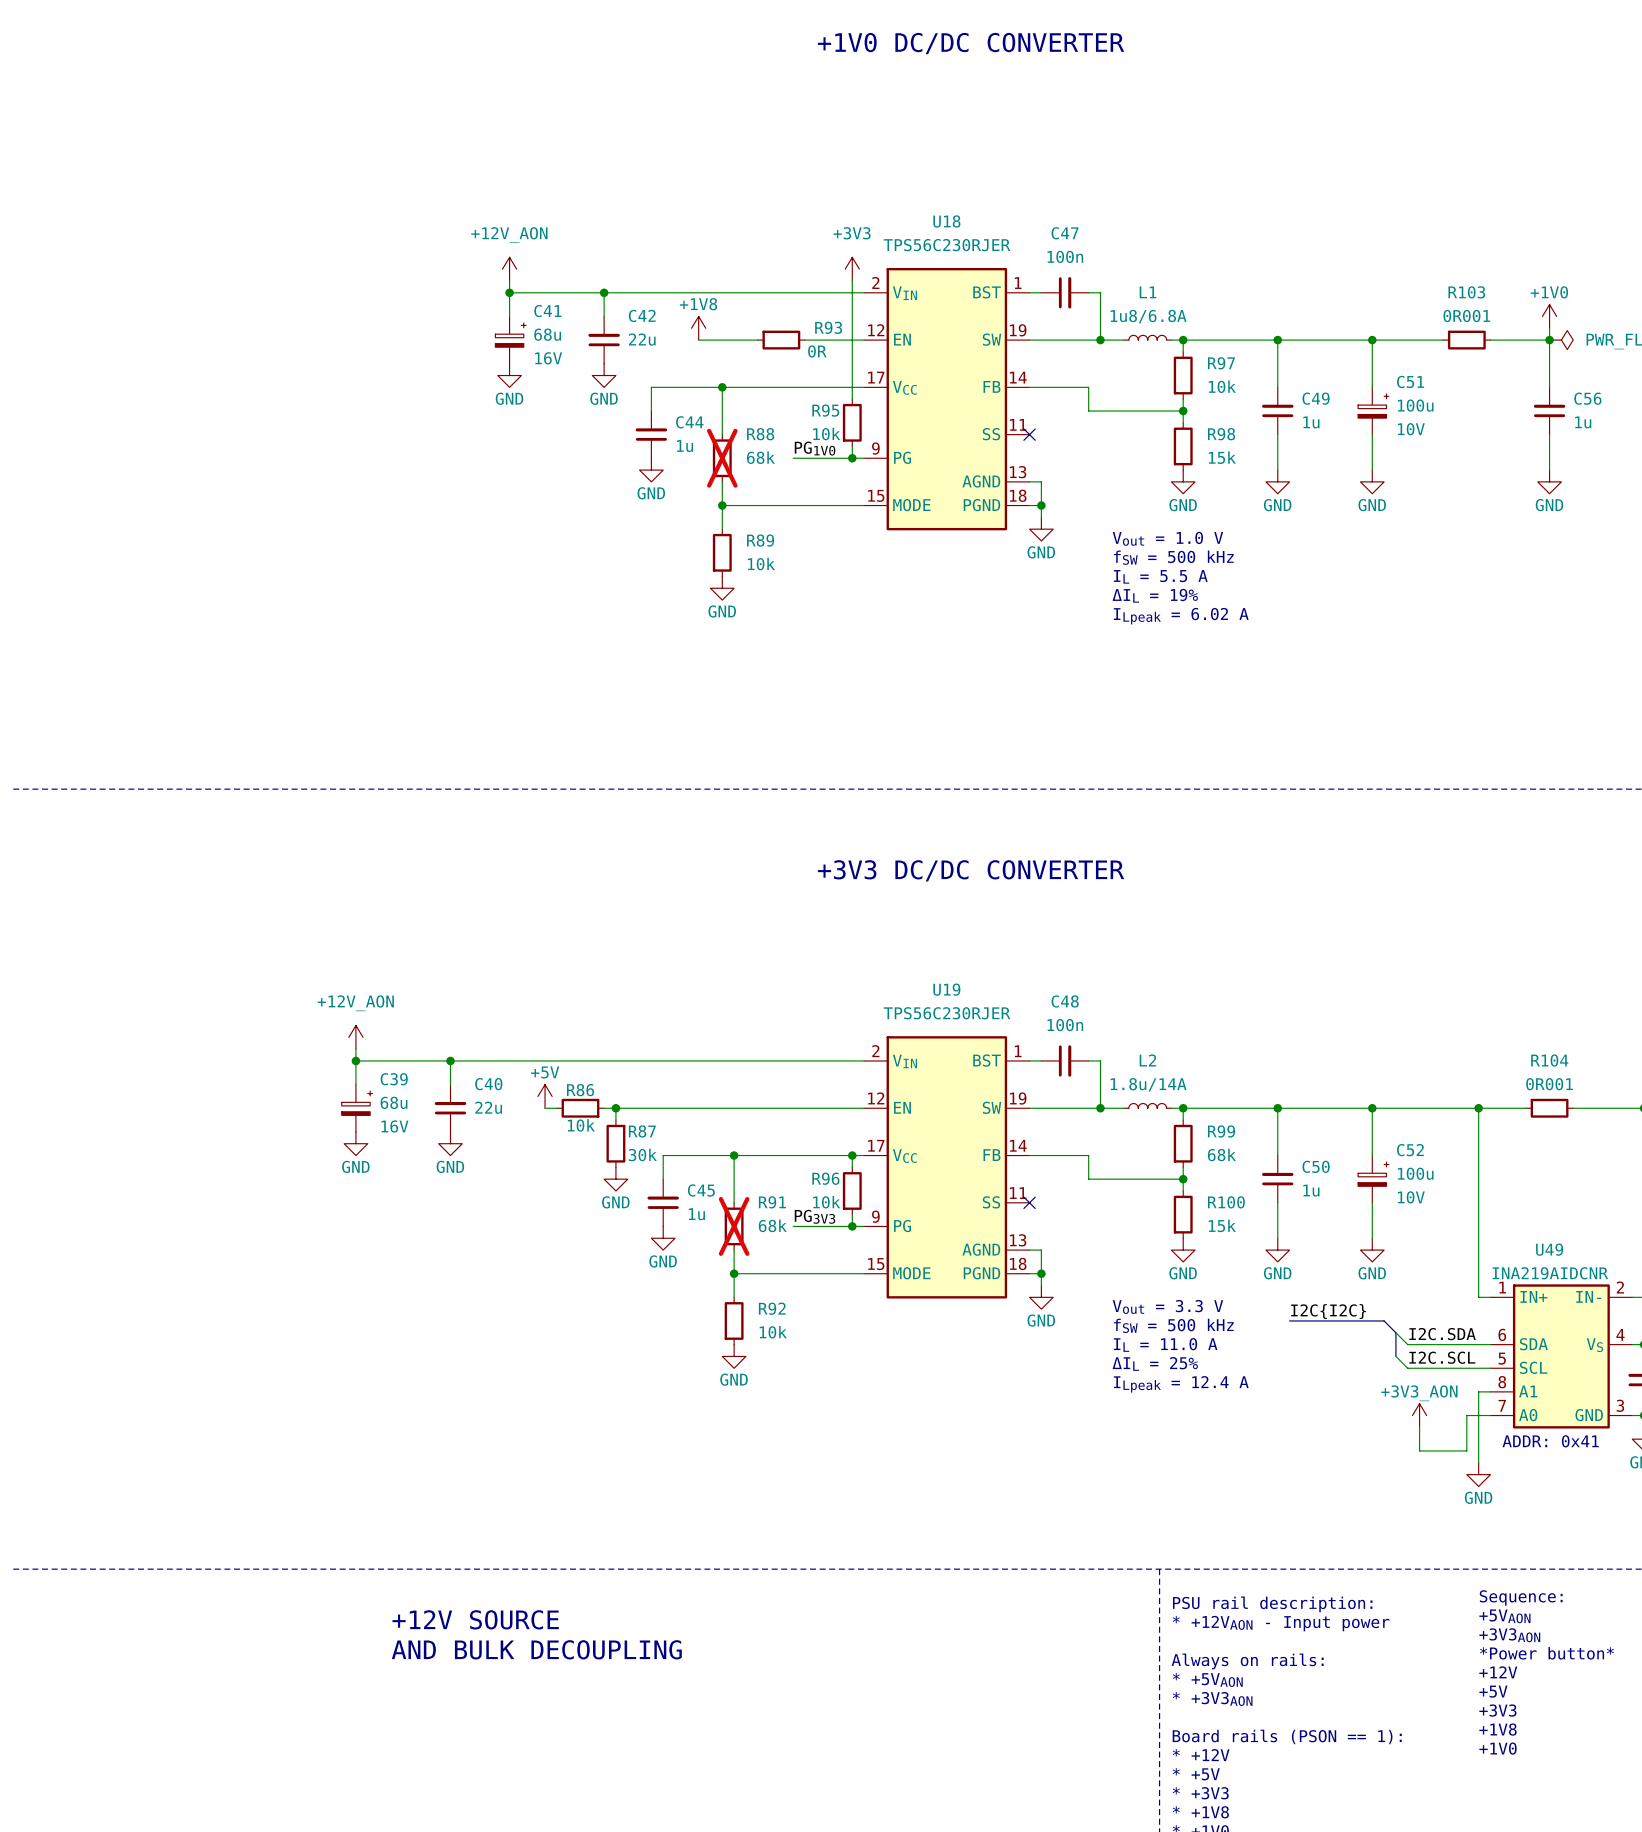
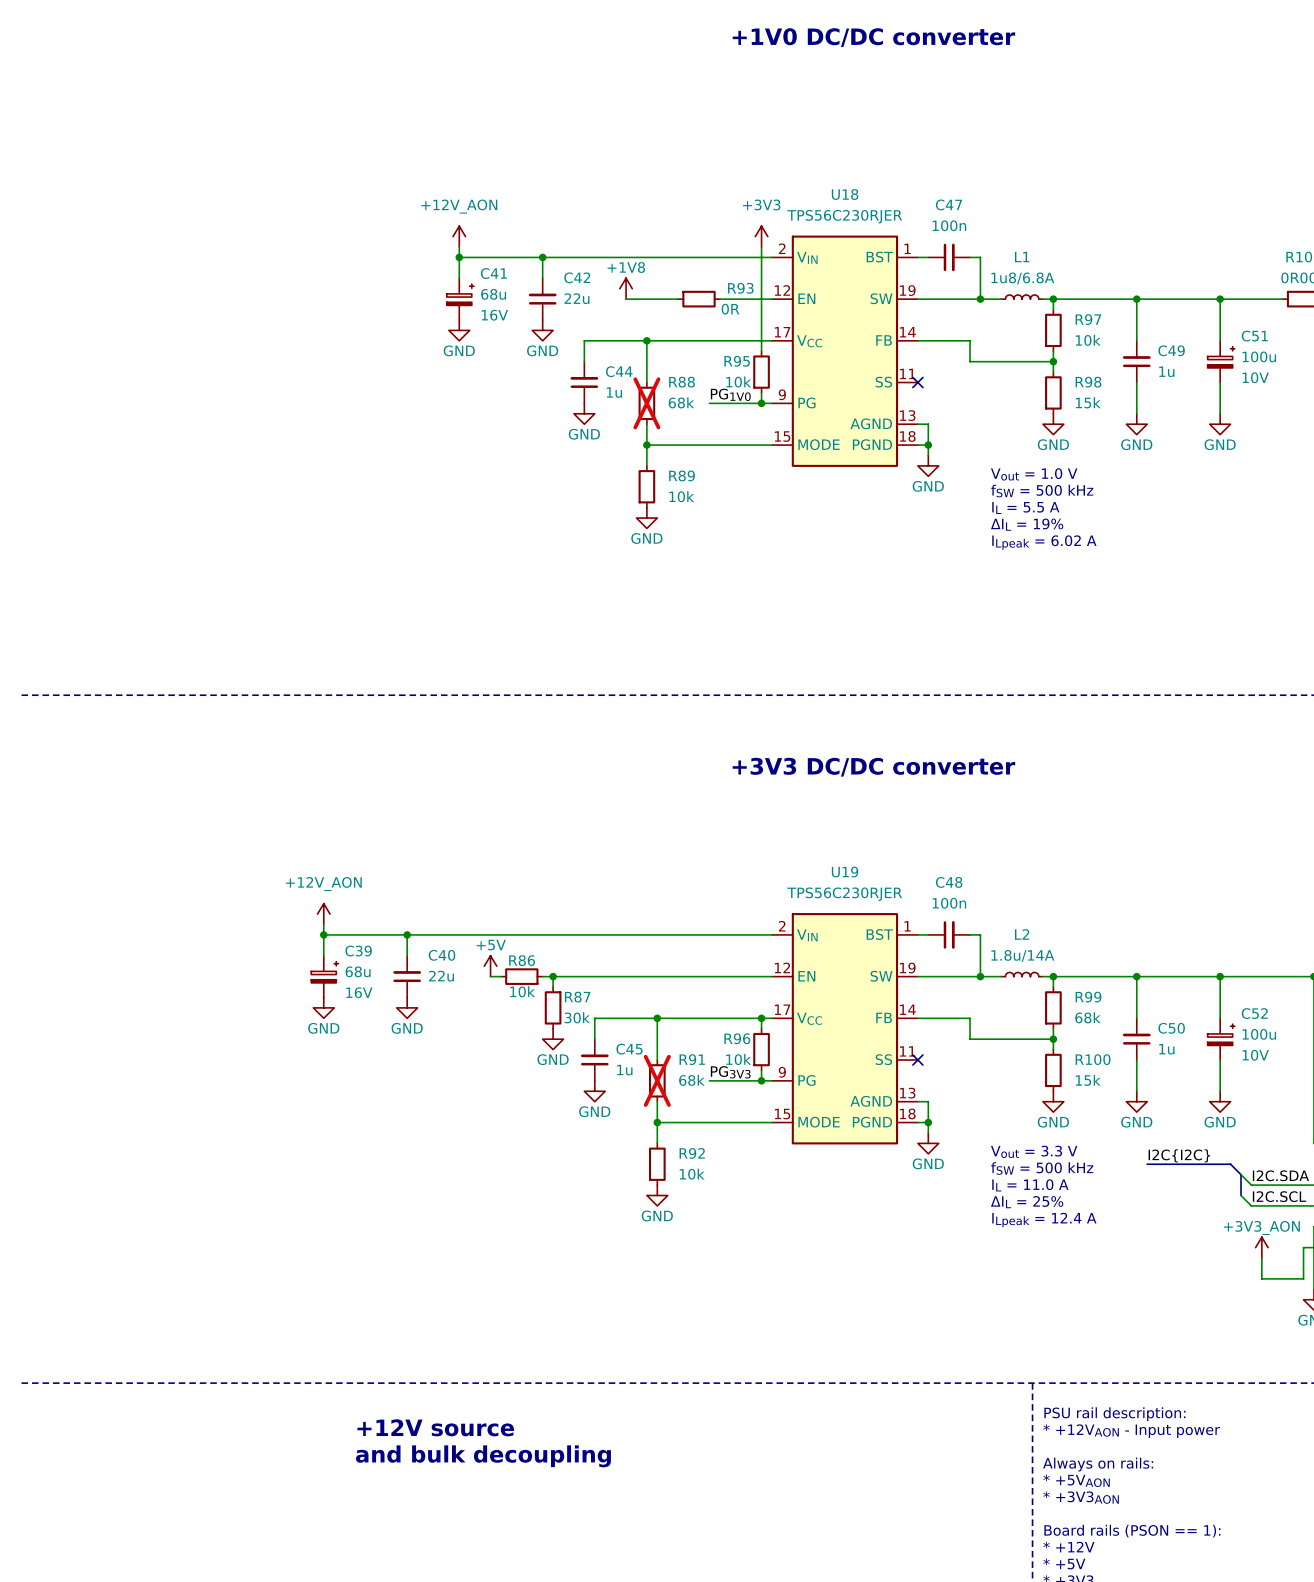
text: +1V0 DC/DC CONVERTER (971, 43) -> +1V0 DC/DC converter (873, 37)
text: +3V3 DC/DC CONVERTER (971, 870) -> +3V3 DC/DC converter (873, 767)
text: +12V SOURCE (475, 1619) -> +12V source (435, 1427)
text: AND BULK DECOUPLING (536, 1649) -> and bulk decoupling (483, 1456)

